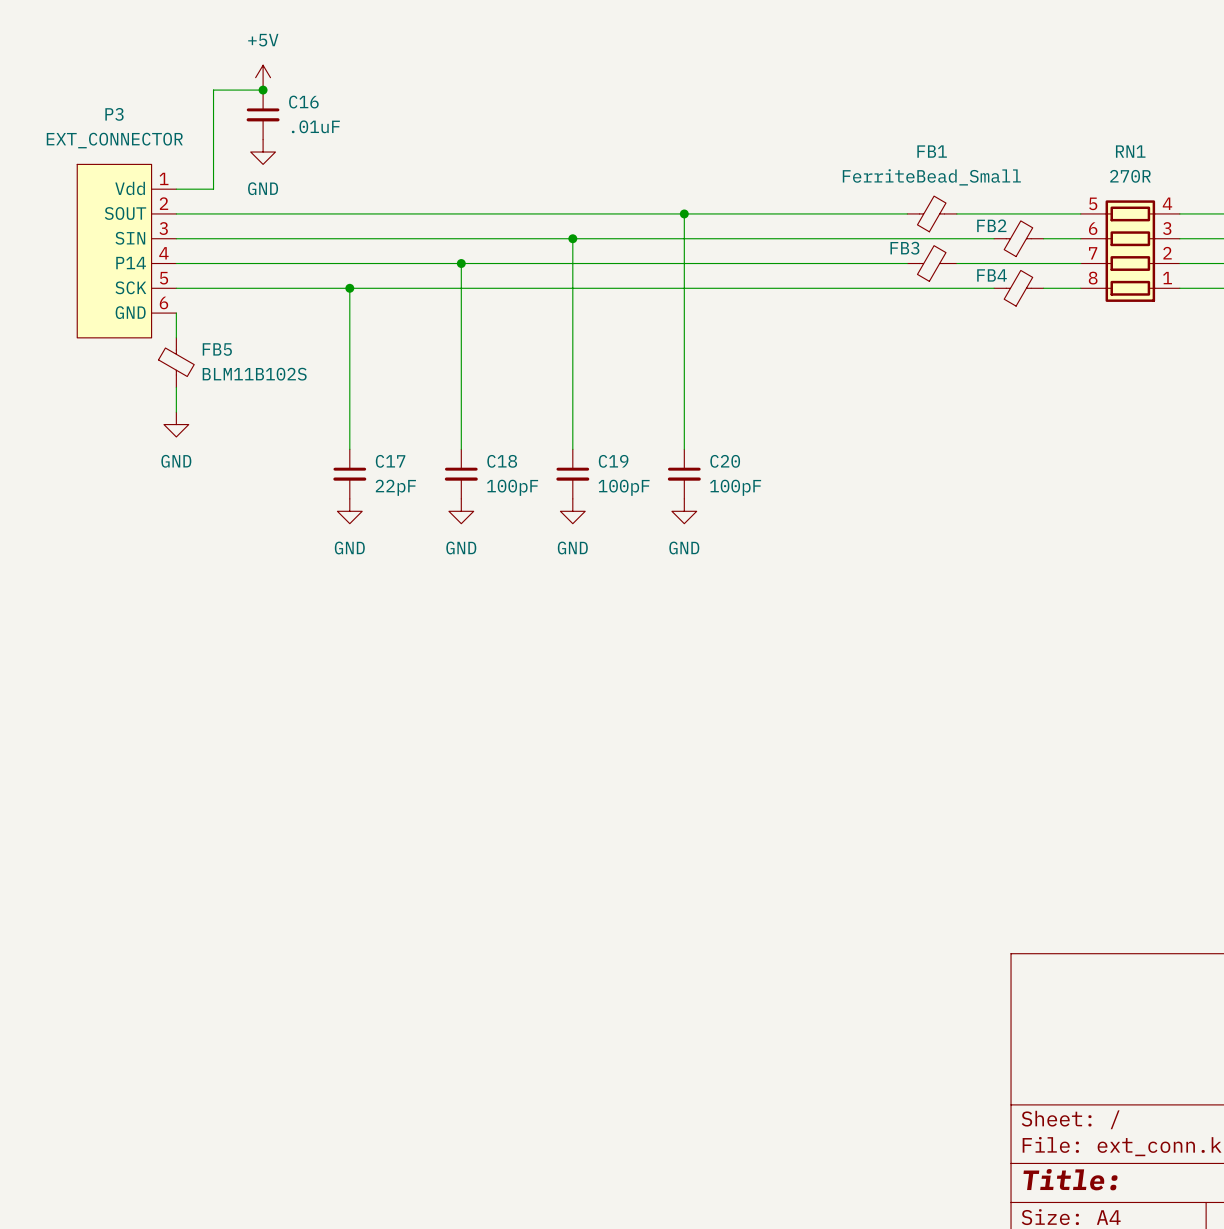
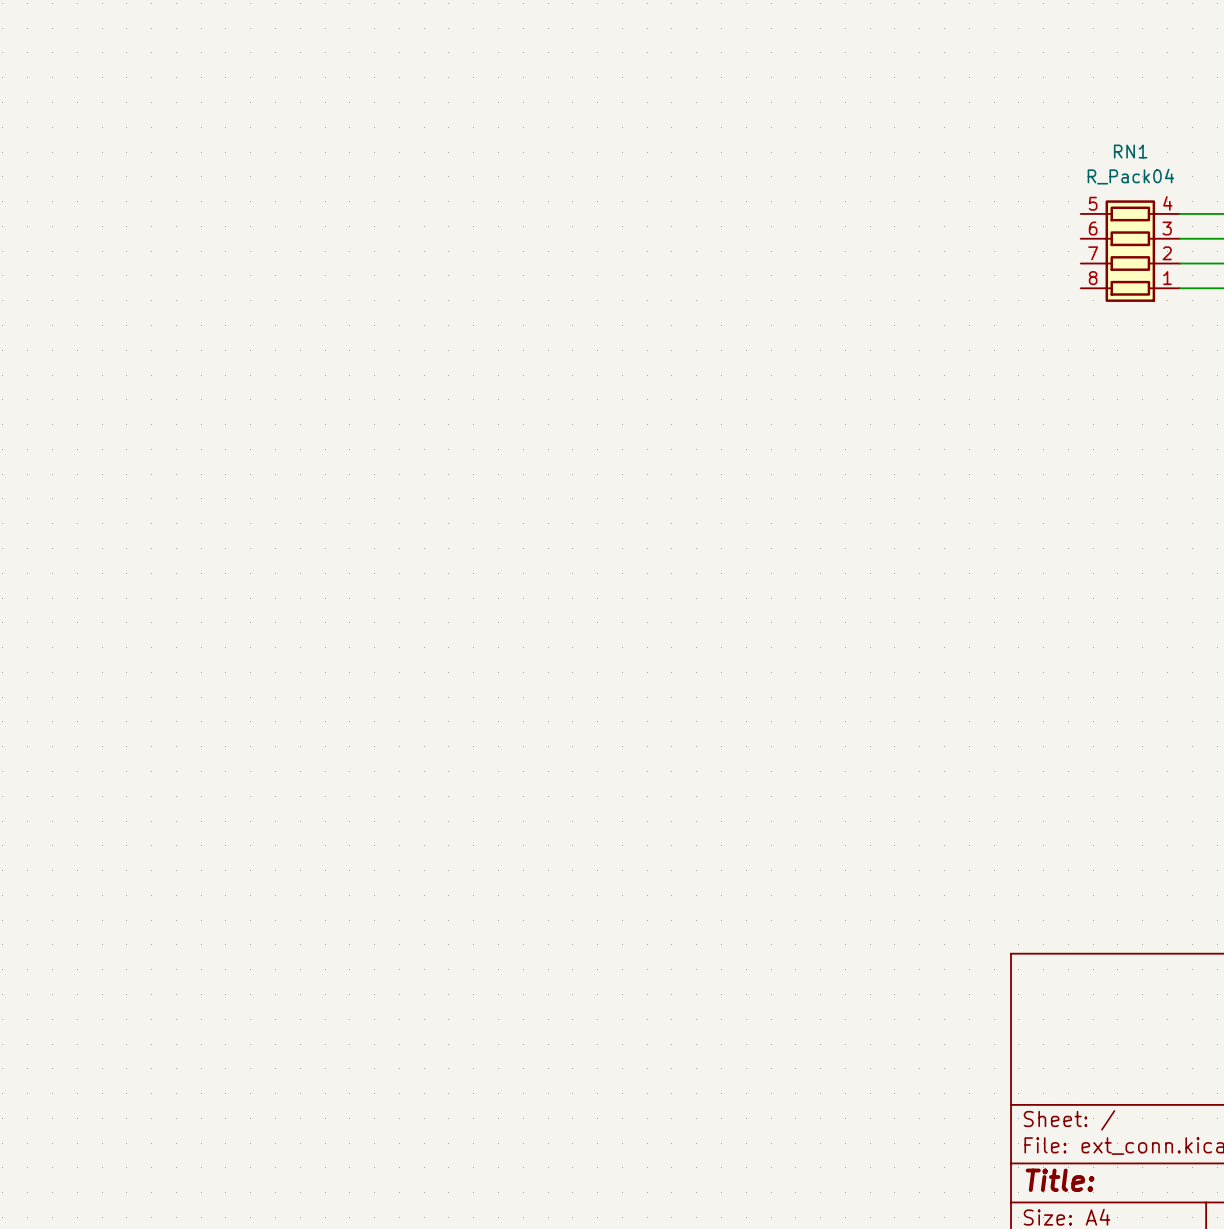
power symbol: +5V (263, 77) -> none
wire: (263, 90) (213, 90) (213, 189) (176, 189) -> none
junction: (263, 90) -> none
C16: .01uF (263, 114) -> none
power symbol: GND (263, 152) -> none
RN1 value: 270R (1130, 176) -> R_Pack04 (1130, 176)
wire: (176, 213) (907, 213) -> none
wire: (684, 213) (684, 449) -> none
junction: (684, 213) -> none
FB1: FerriteBead_Small (932, 213) -> none
wire: (956, 213) (1080, 213) -> none
wire: (176, 238) (994, 238) -> none
wire: (572, 238) (572, 449) -> none
junction: (572, 238) -> none
FB2: (1018, 238) -> none
wire: (1043, 238) (1080, 238) -> none
P3: EXT_CONNECTOR (126, 251) -> none
wire: (176, 263) (907, 263) -> none
wire: (461, 263) (461, 449) -> none
junction: (461, 263) -> none
FB3: (932, 263) -> none
wire: (956, 263) (1080, 263) -> none
wire: (176, 288) (994, 288) -> none
wire: (349, 288) (349, 449) -> none
junction: (349, 288) -> none
FB4: (1018, 288) -> none
wire: (1043, 288) (1080, 288) -> none
wire: (176, 313) (176, 337) -> none
FB5: BLM11B102S (176, 362) -> none
wire: (176, 387) (176, 412) -> none
power symbol: GND (176, 424) -> none
C17: 22pF (349, 474) -> none
C18: 100pF (461, 474) -> none
C19: 100pF (572, 474) -> none
C20: 100pF (684, 474) -> none
power symbol: GND (349, 511) -> none
power symbol: GND (461, 511) -> none
power symbol: GND (572, 511) -> none
power symbol: GND (684, 511) -> none

